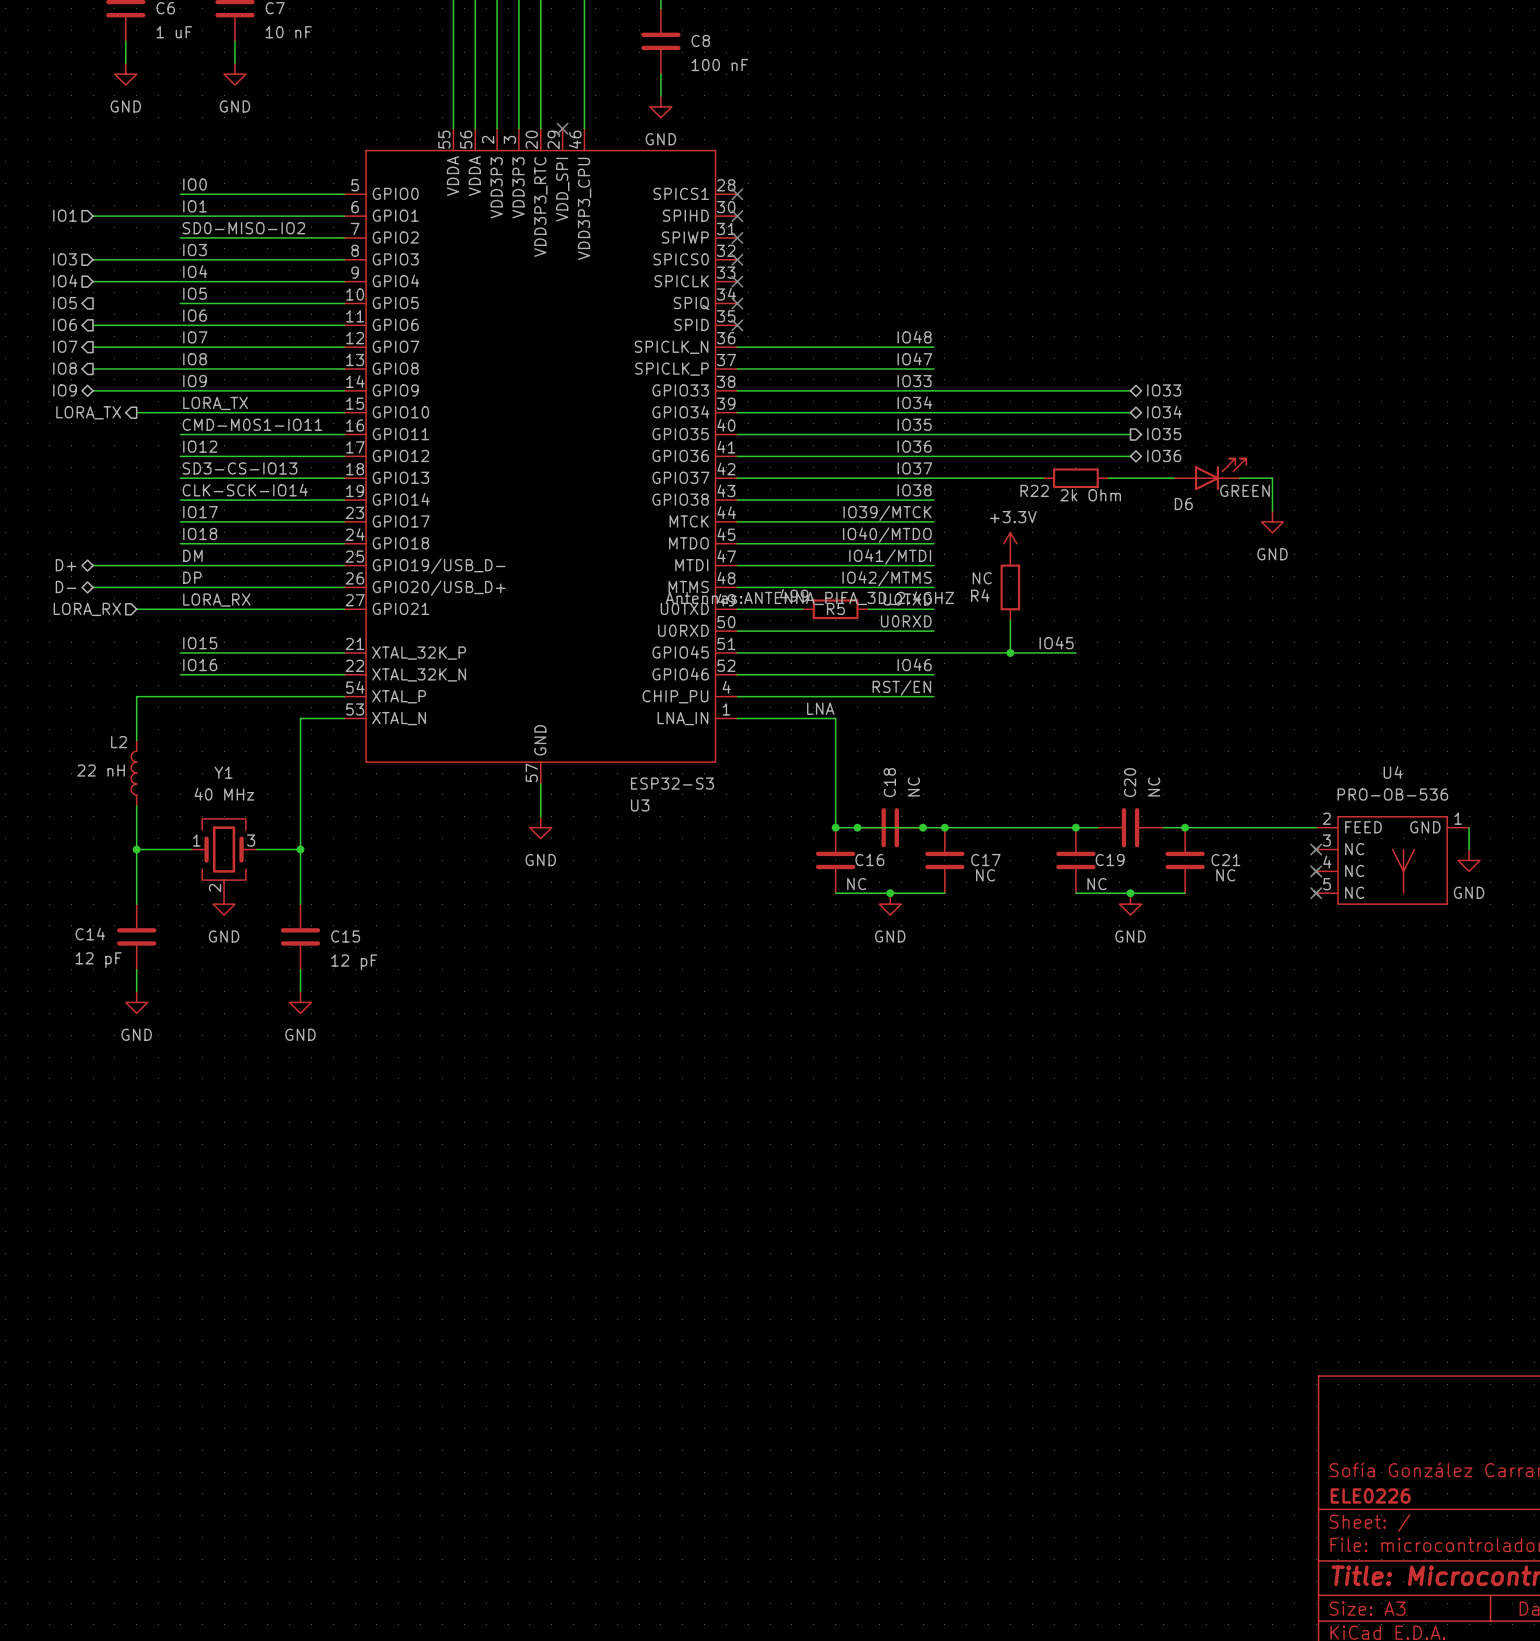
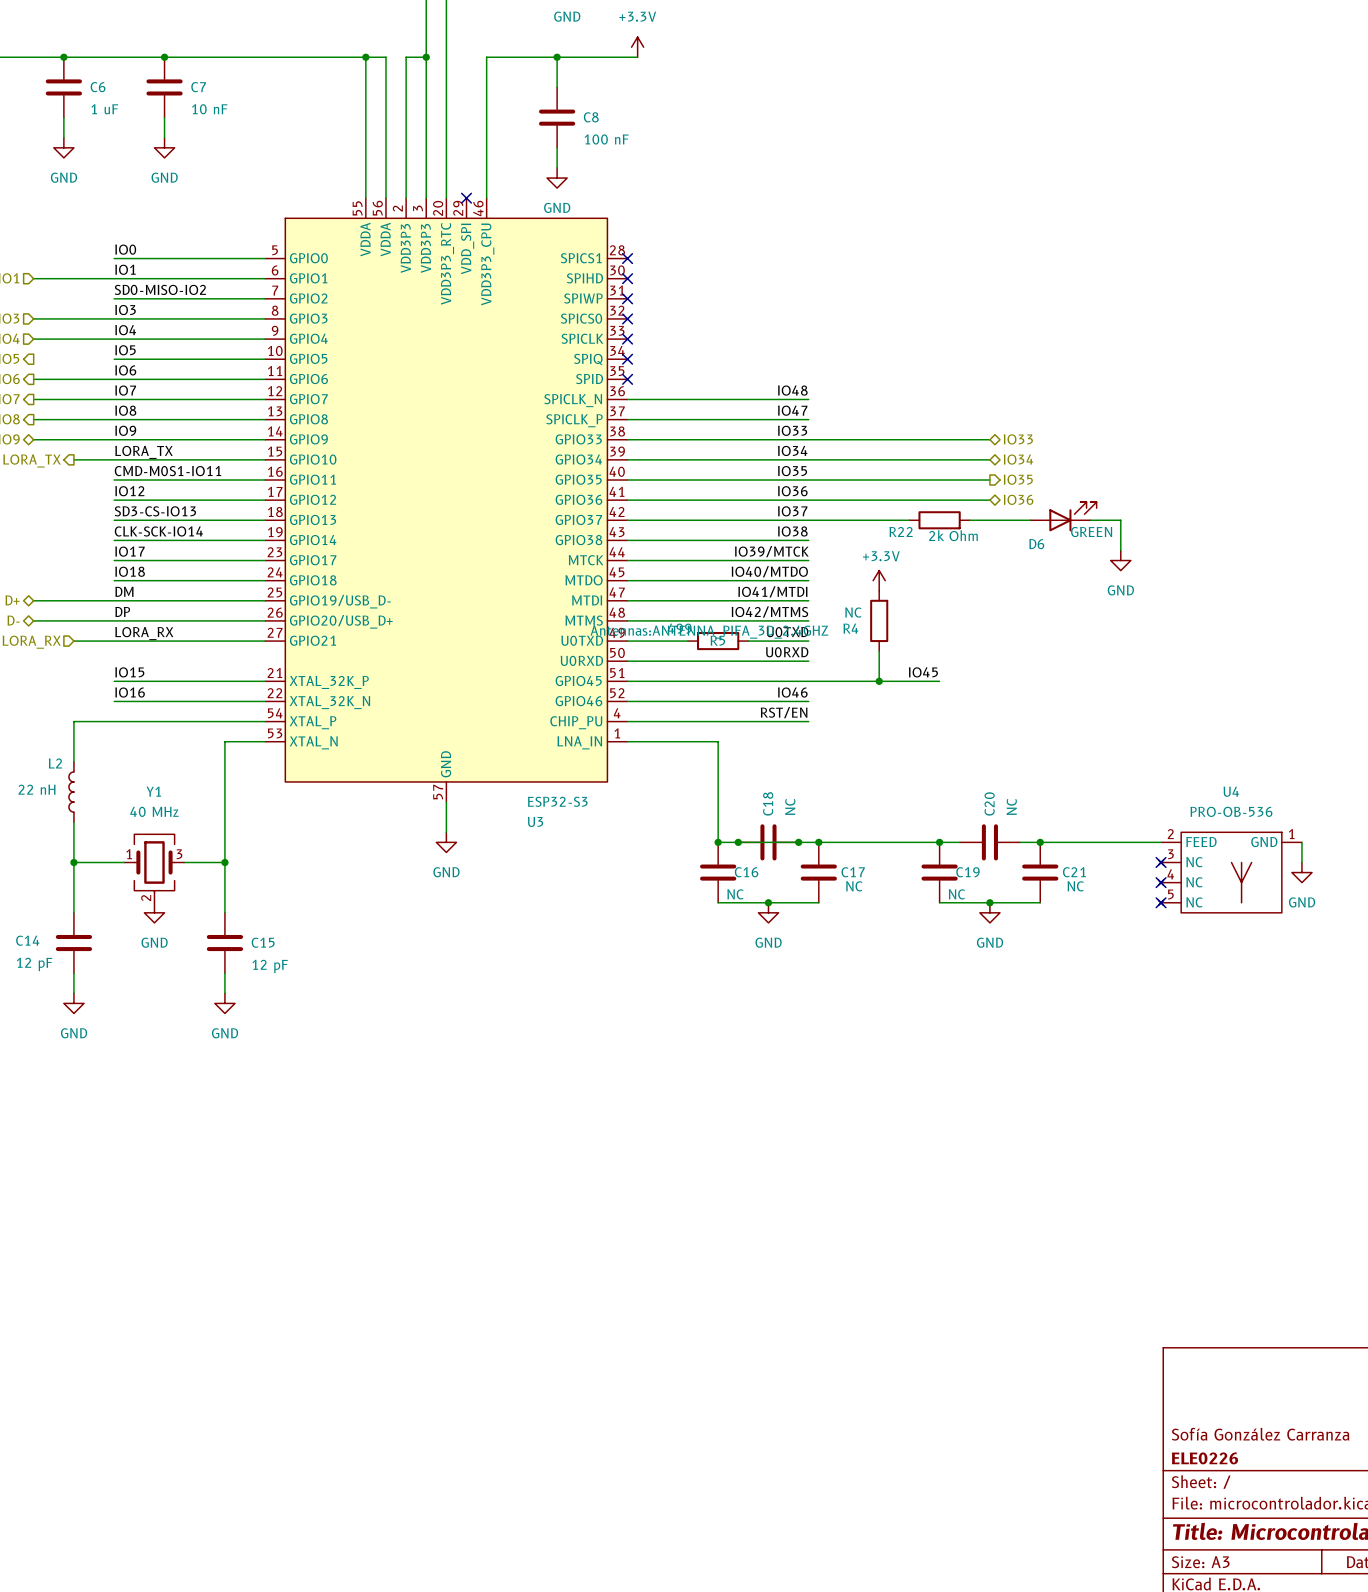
label: LNA (820, 708) -> none

